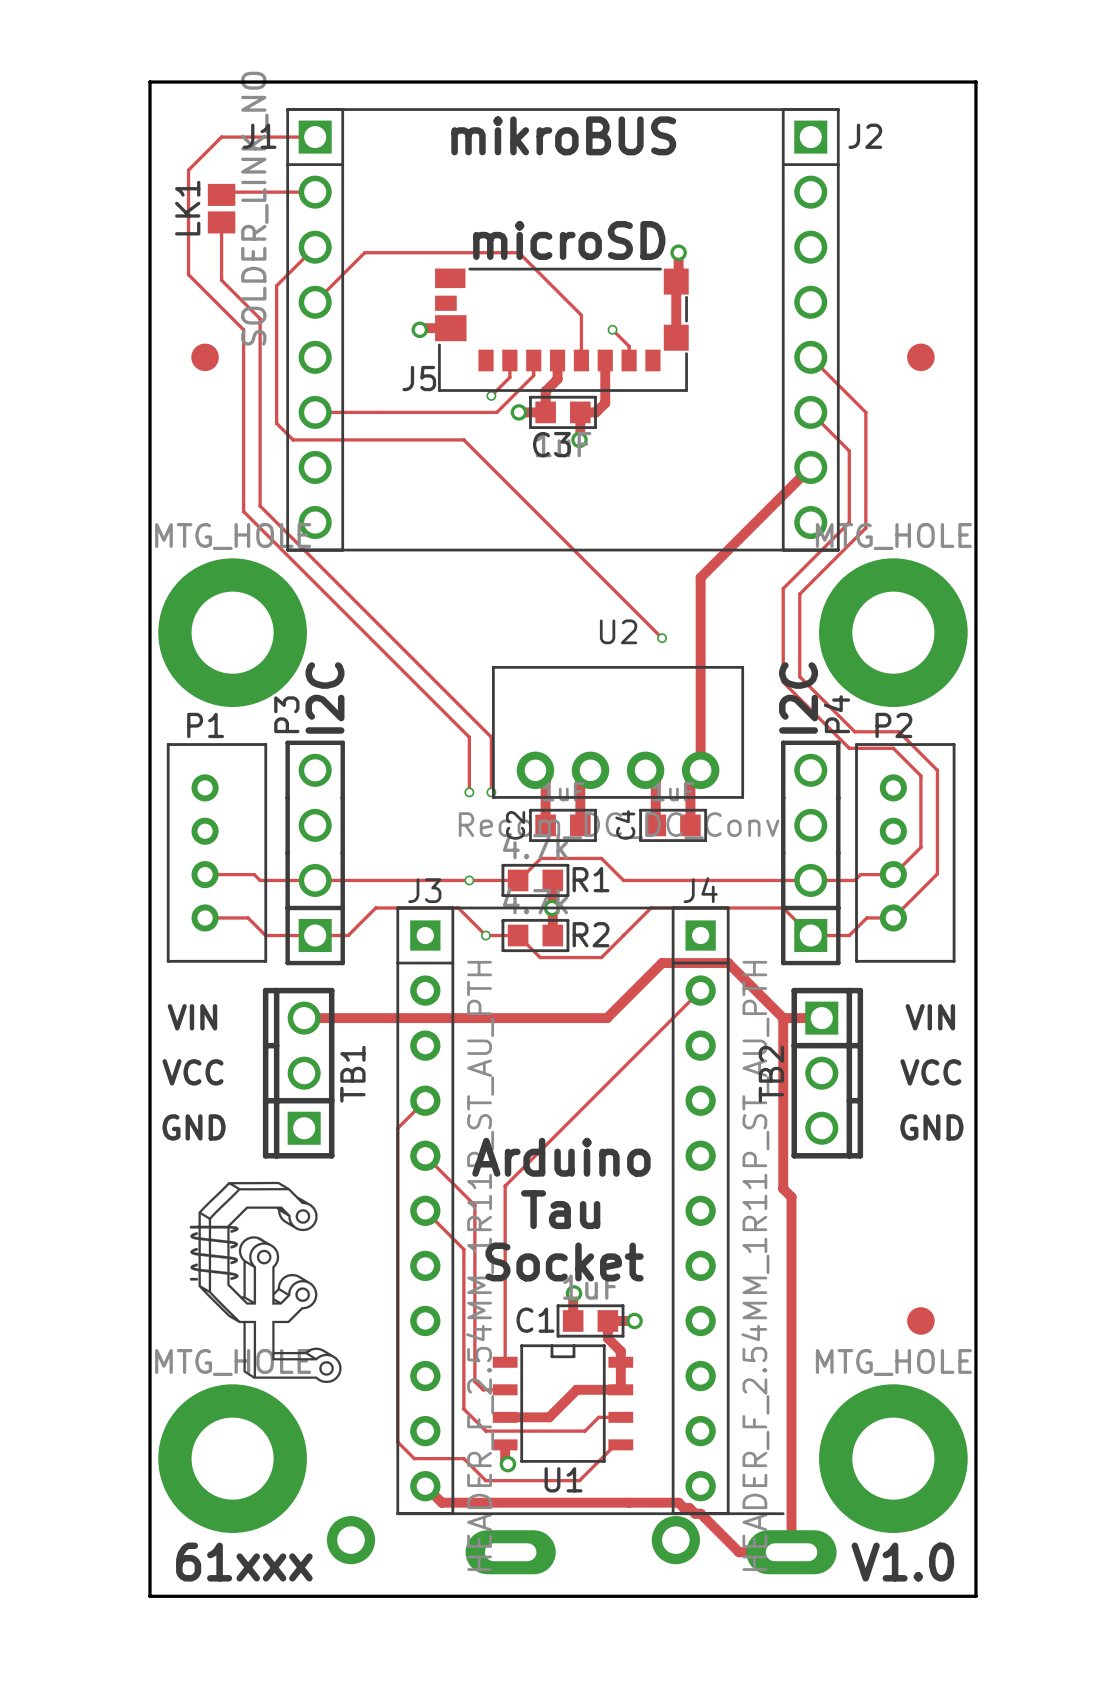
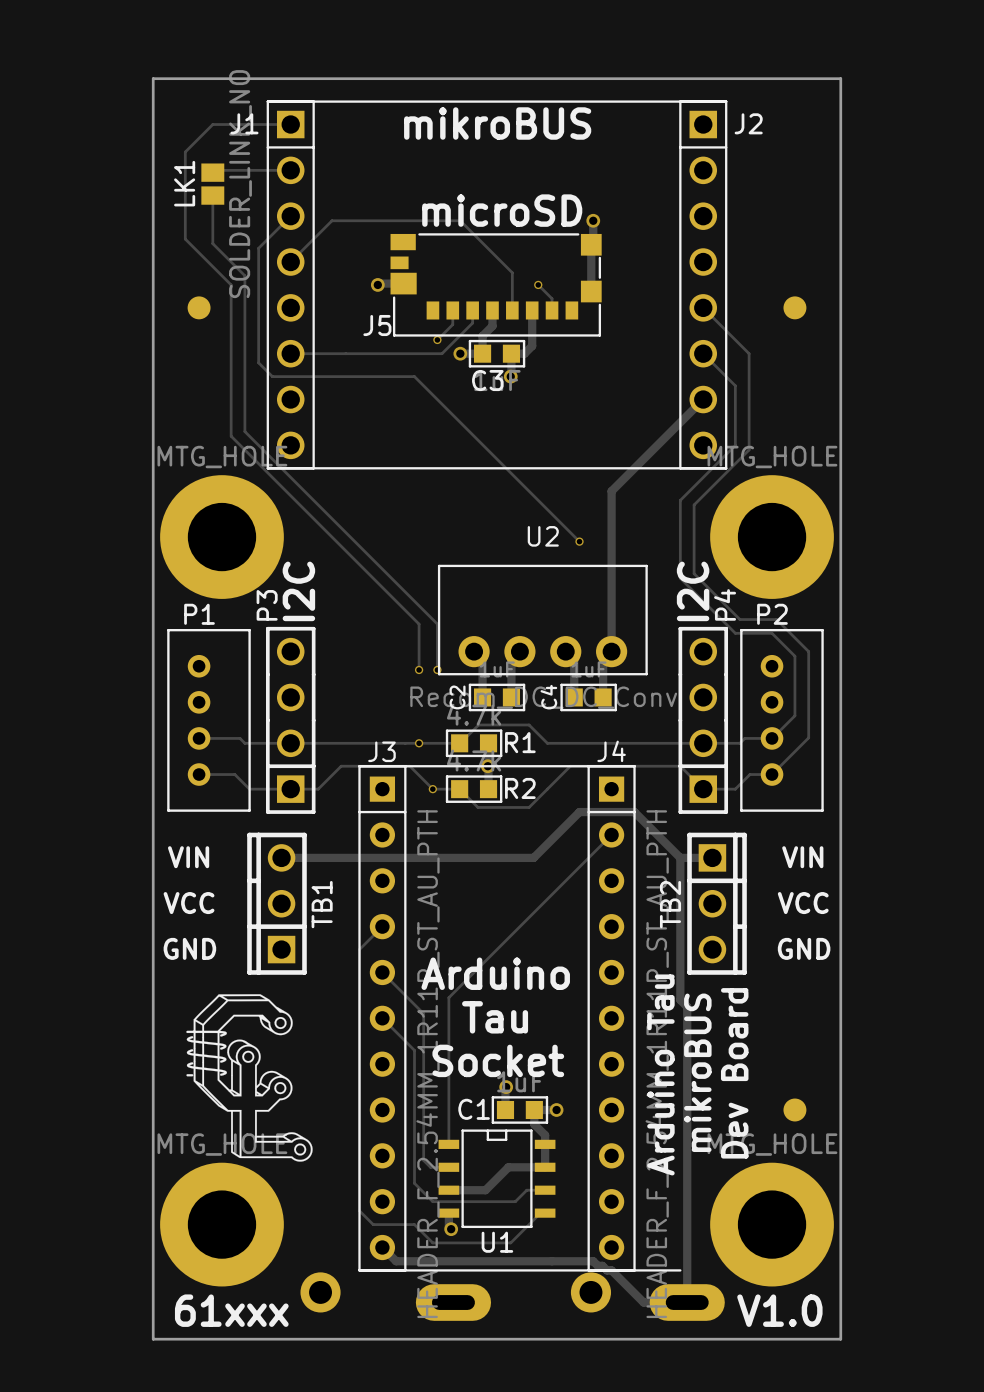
text: none -> mikroBUS (697, 1072)
text: none -> Dev Board (734, 1073)
text: none -> Arduino Tau (660, 1074)

